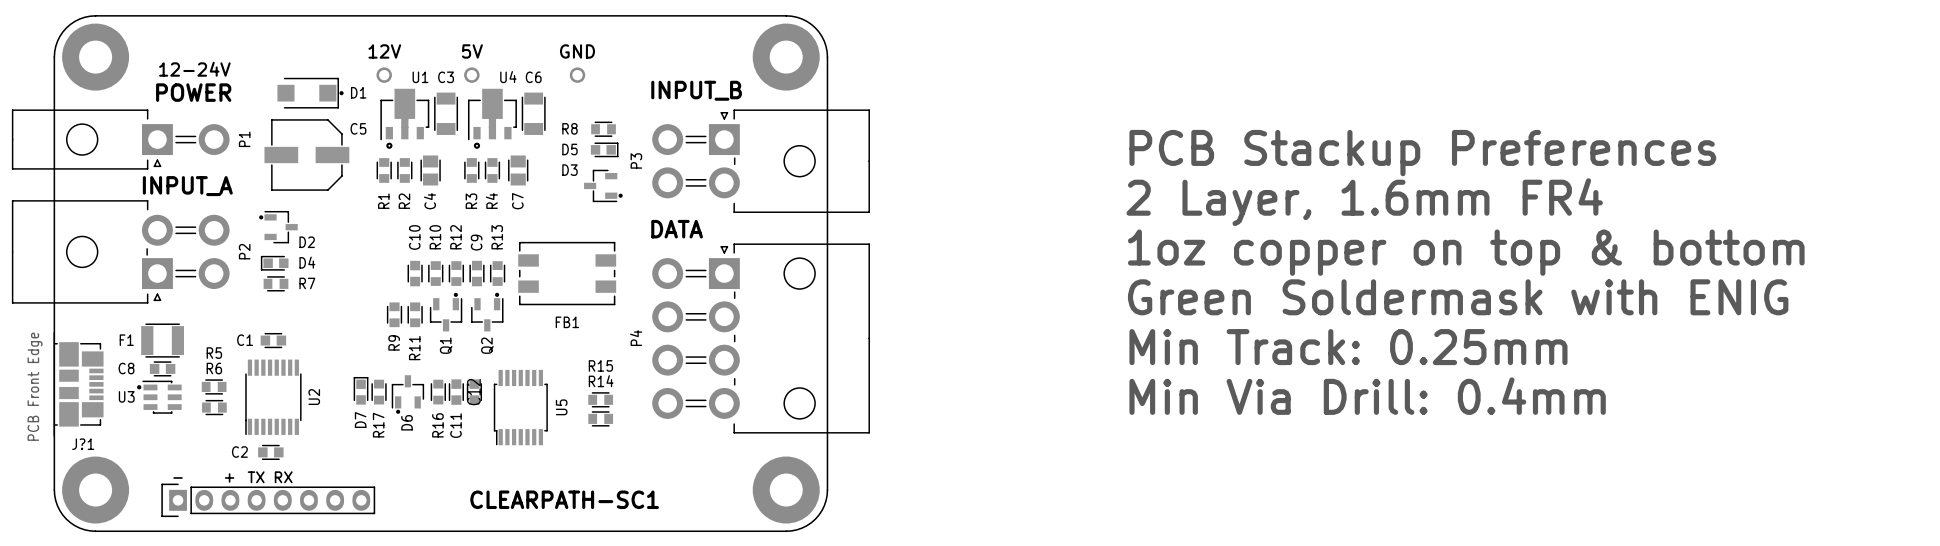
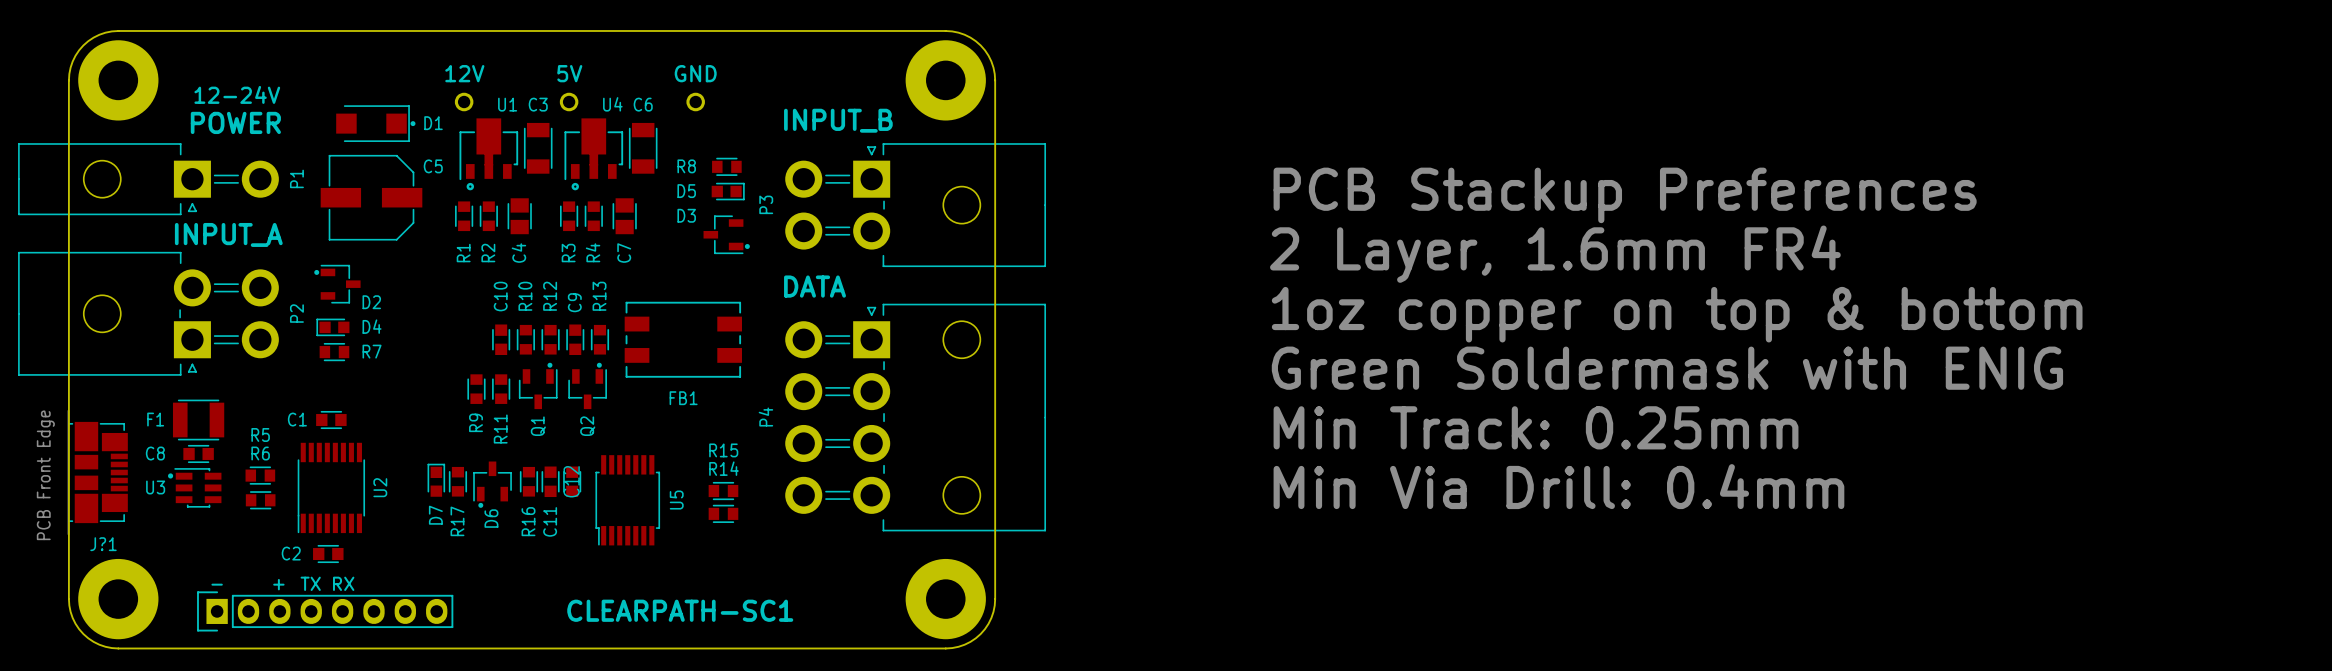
text position: PCB Stackup Preferences (1422, 153) -> PCB Stackup Preferences (1625, 195)
text position: 2 Layer, 1.6mm FR4 (1364, 202) -> 2 Layer, 1.6mm FR4 (1555, 254)
text position: 1oz copper on top & bottom (1466, 252) -> 1oz copper on top & bottom (1677, 314)
text position: Green Soldermask with ENIG (1458, 297) -> Green Soldermask with ENIG (1667, 368)
text position: Min Track: 0.25mm (1348, 347) -> Min Track: 0.25mm (1536, 427)
text position: Min Via Drill: 0.4mm (1367, 396) -> Min Via Drill: 0.4mm (1558, 486)

